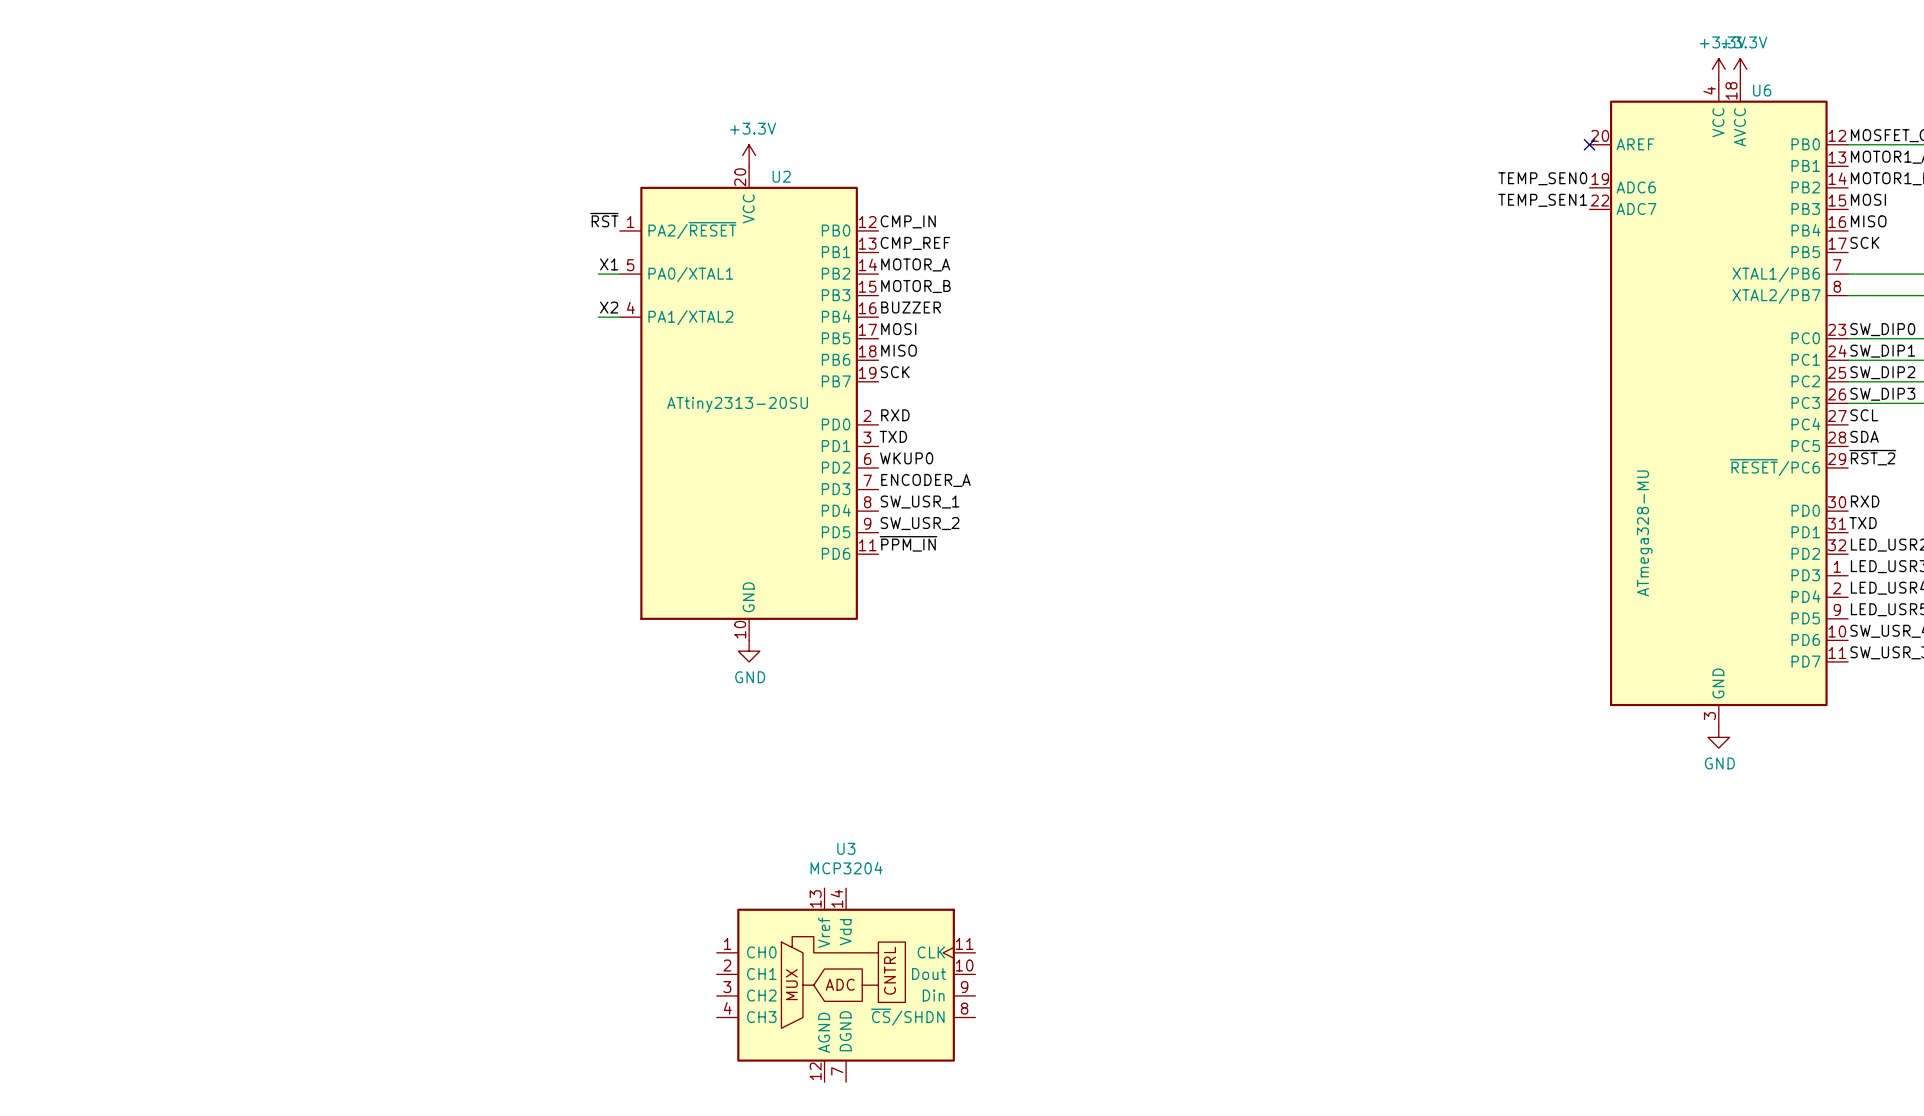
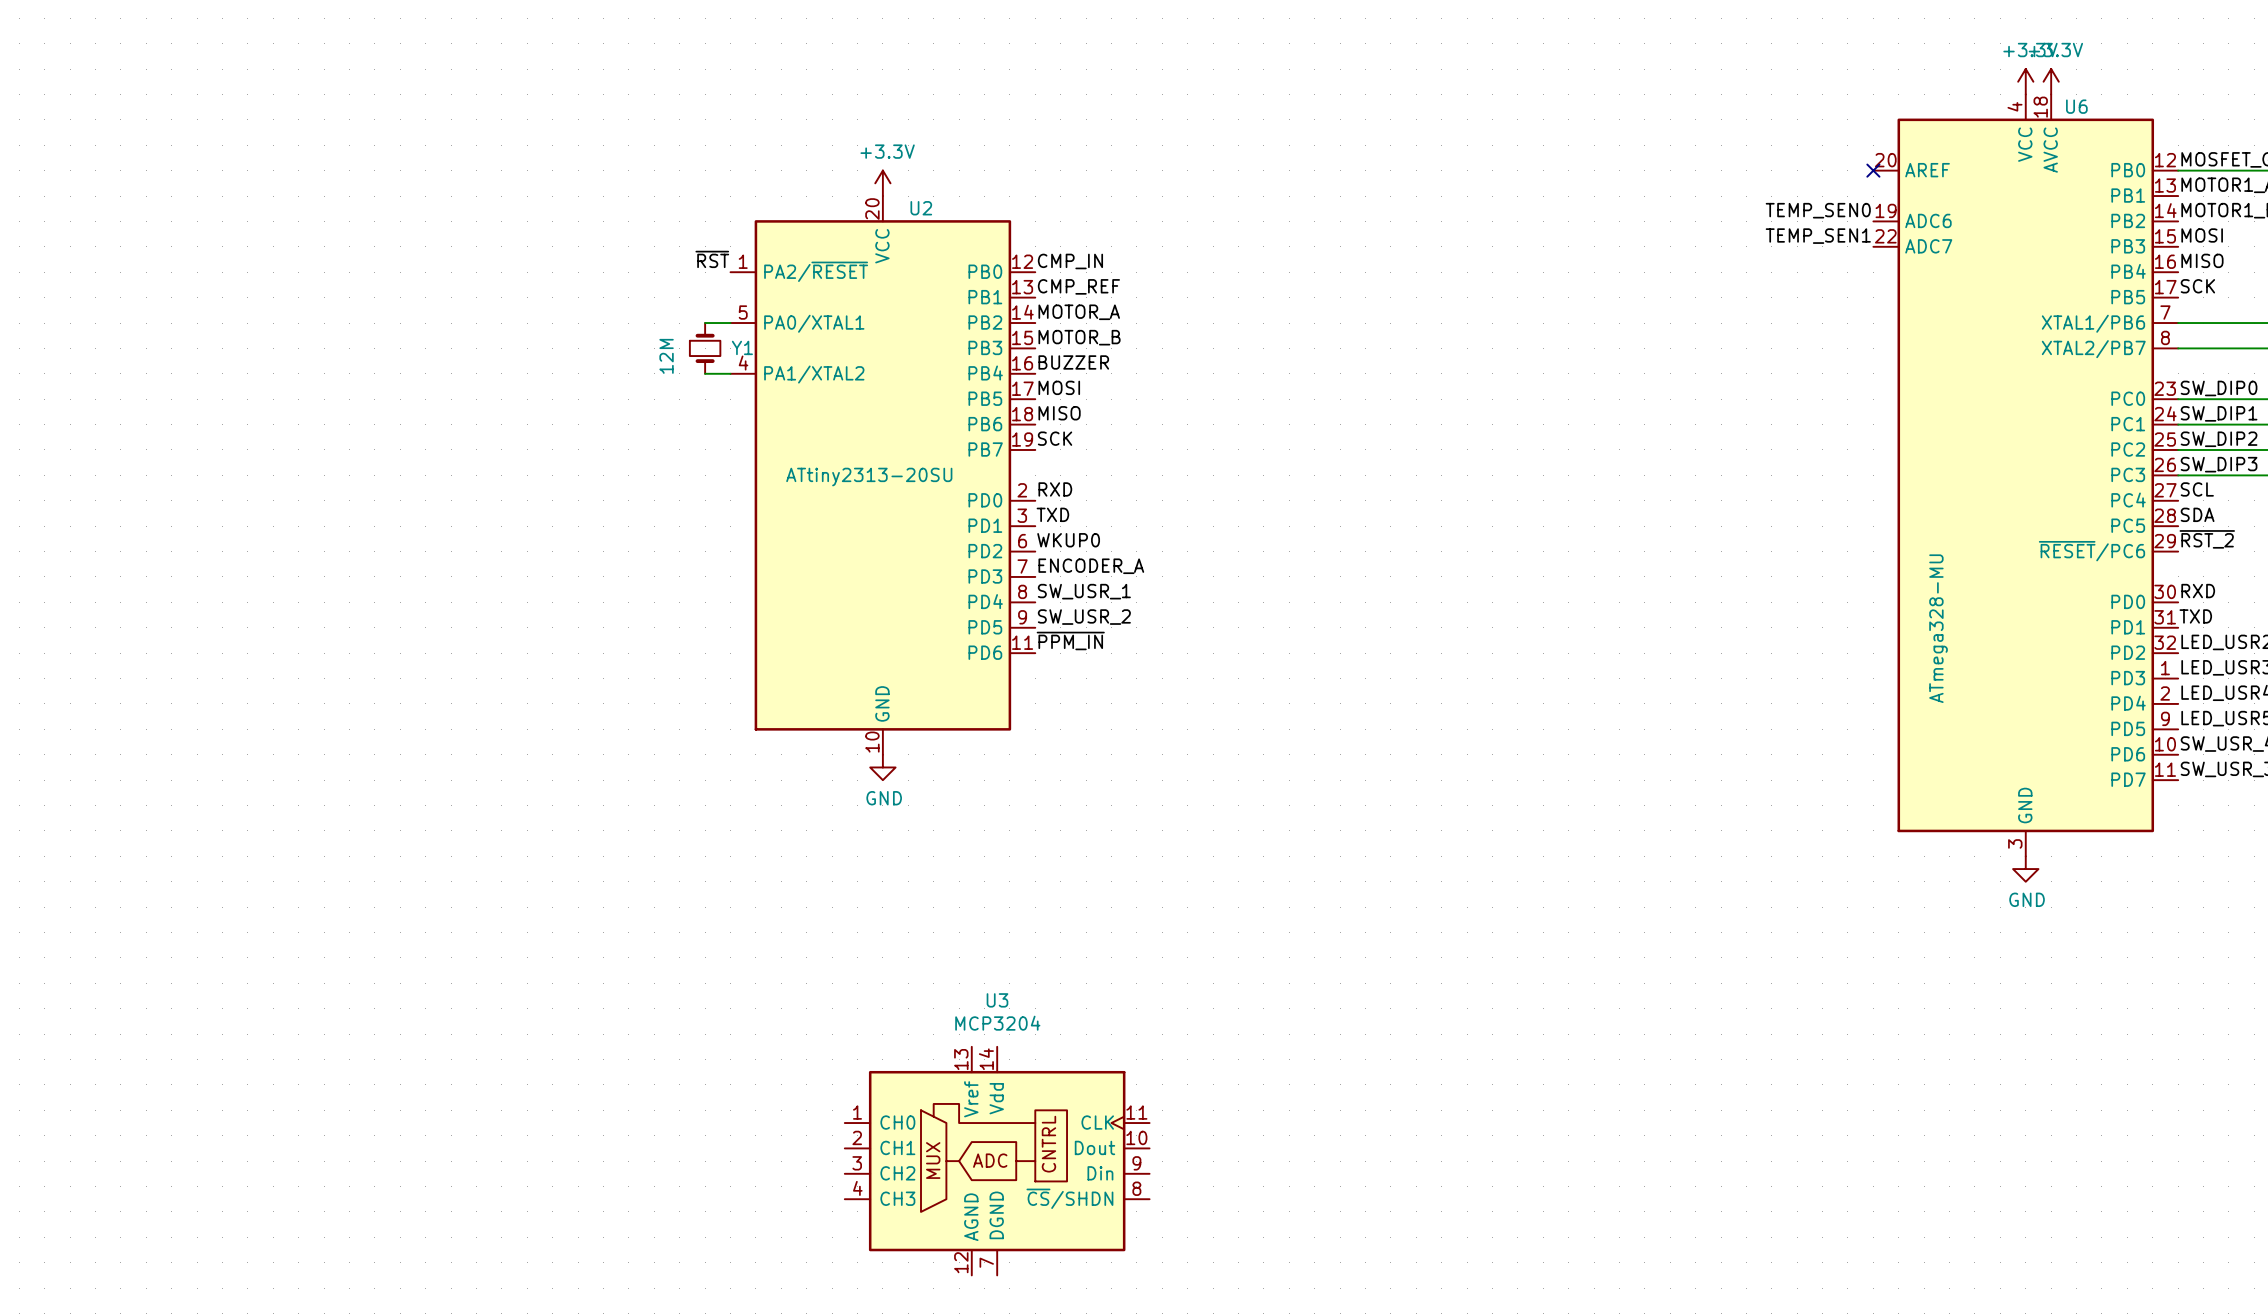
label: X1 (609, 264) -> none
Y1: none -> 12M (705, 348)
label: X2 (609, 307) -> none

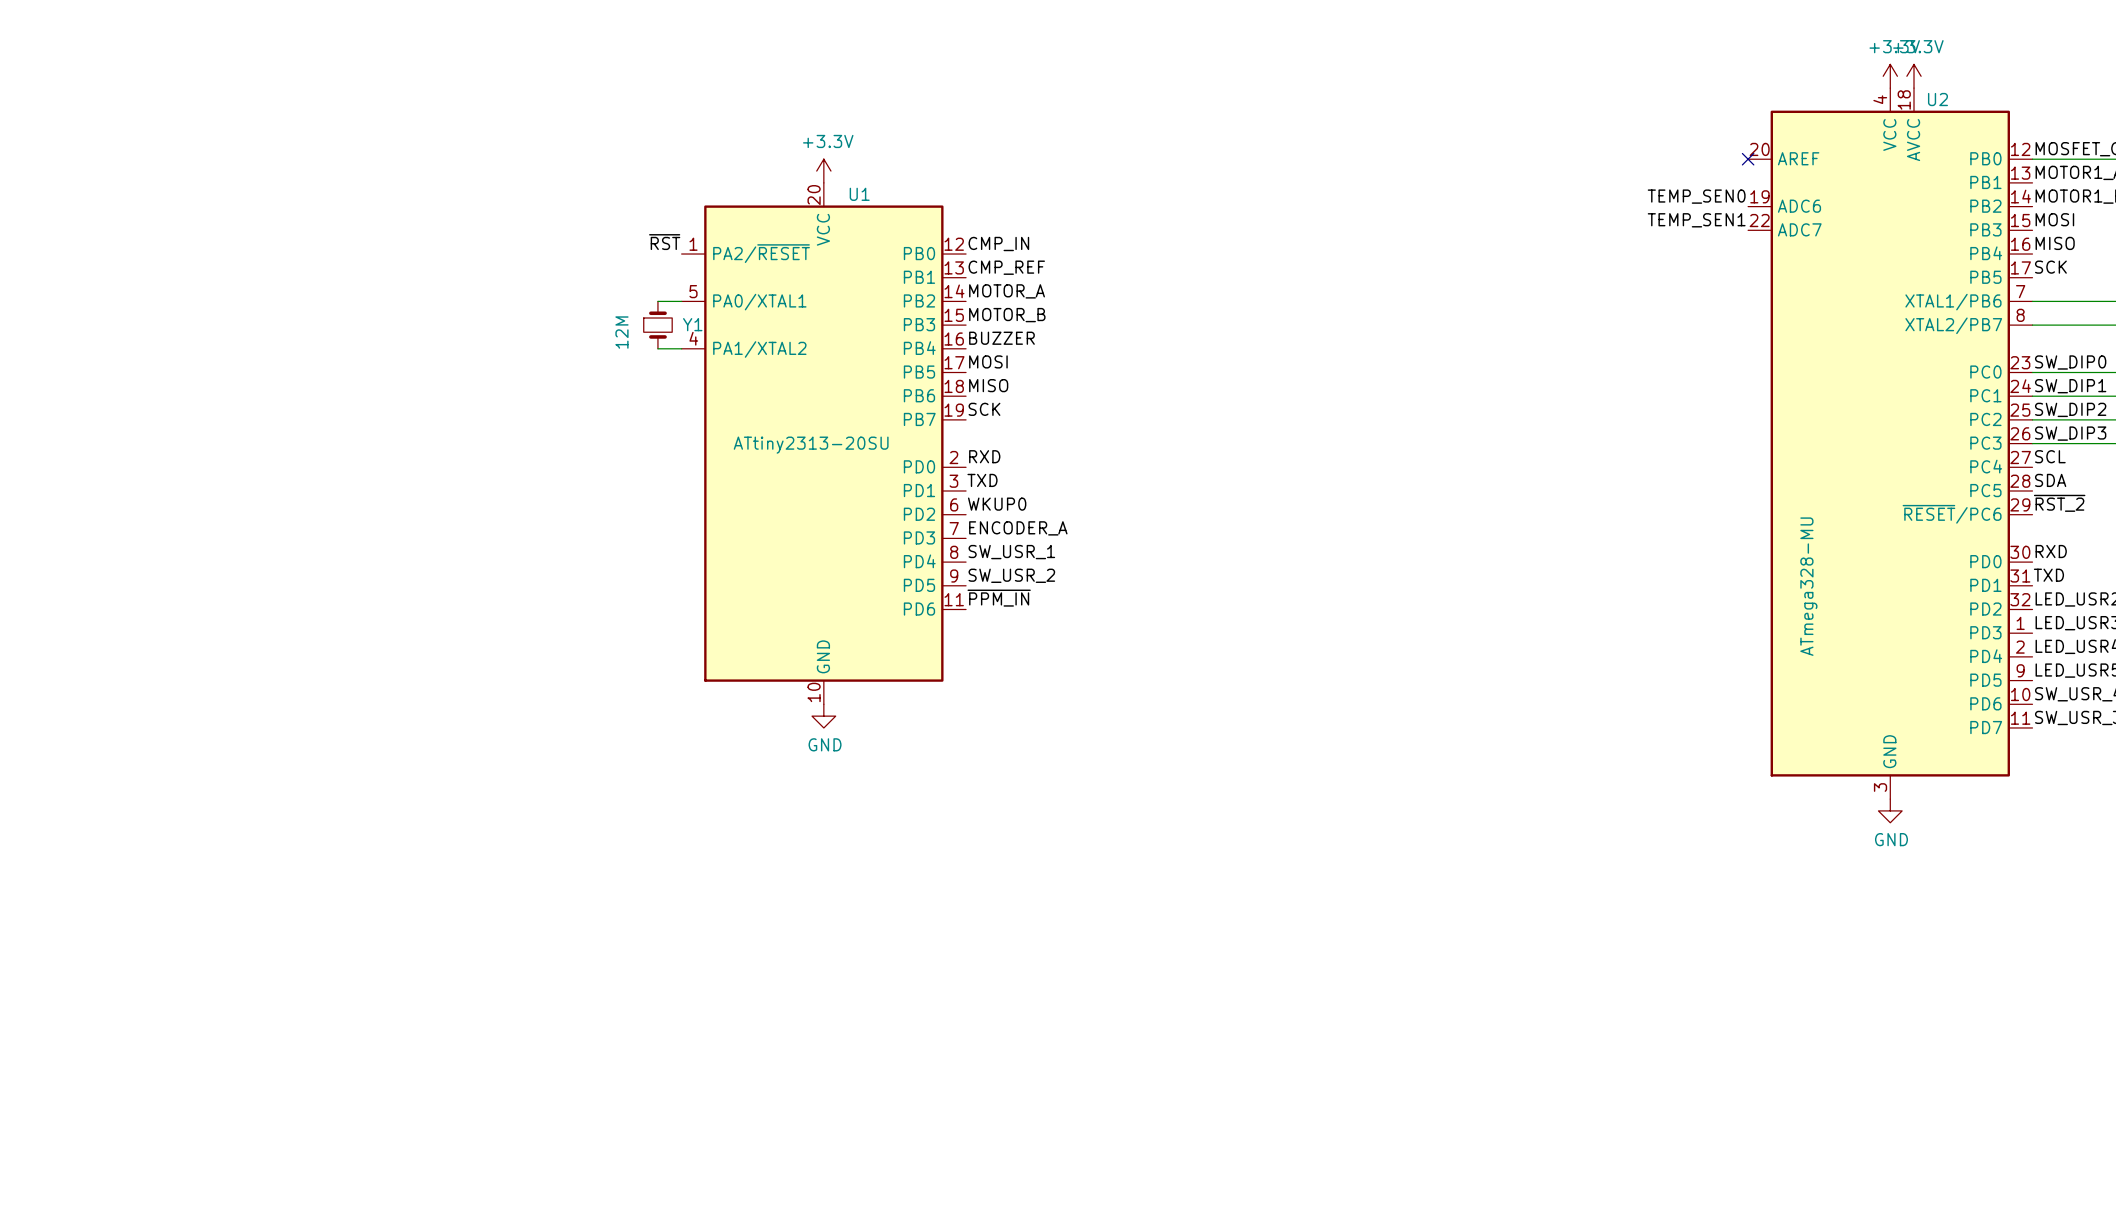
U6 name: U6 (2076, 106) -> U2 (1937, 99)
U2 name: U2 (921, 208) -> U1 (859, 194)
U3: MCP3204 (997, 1161) -> none

